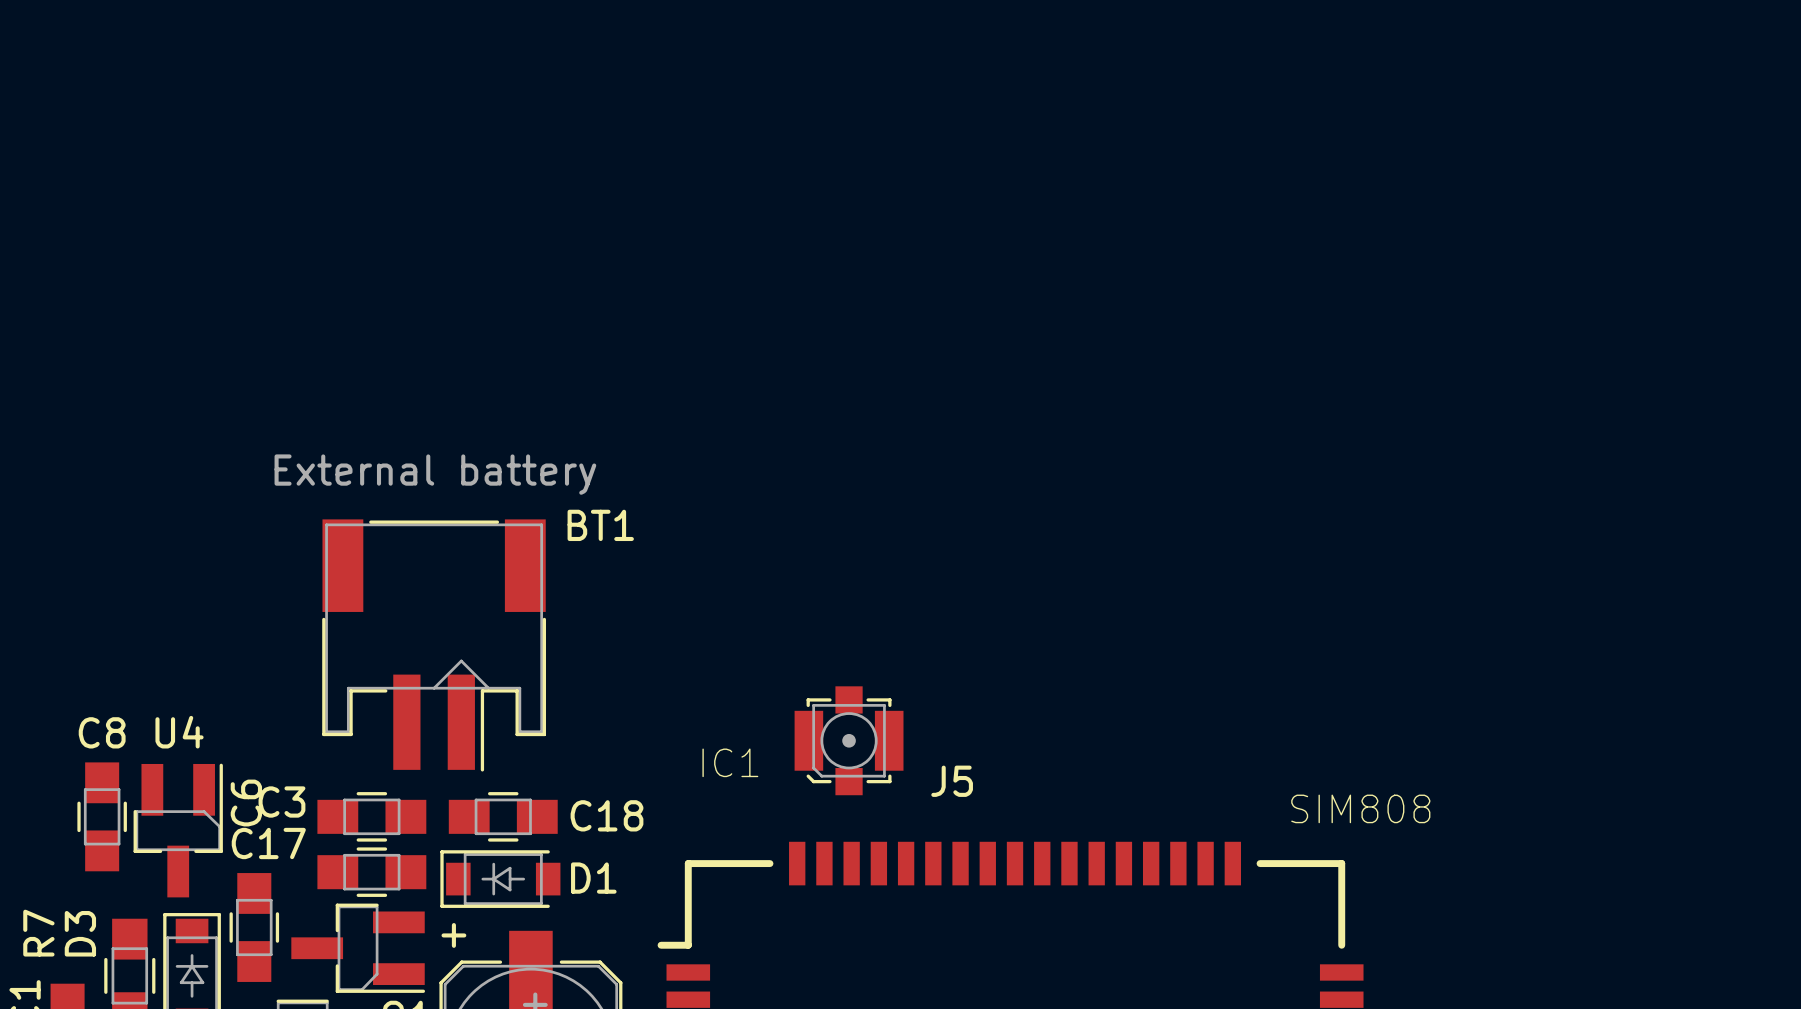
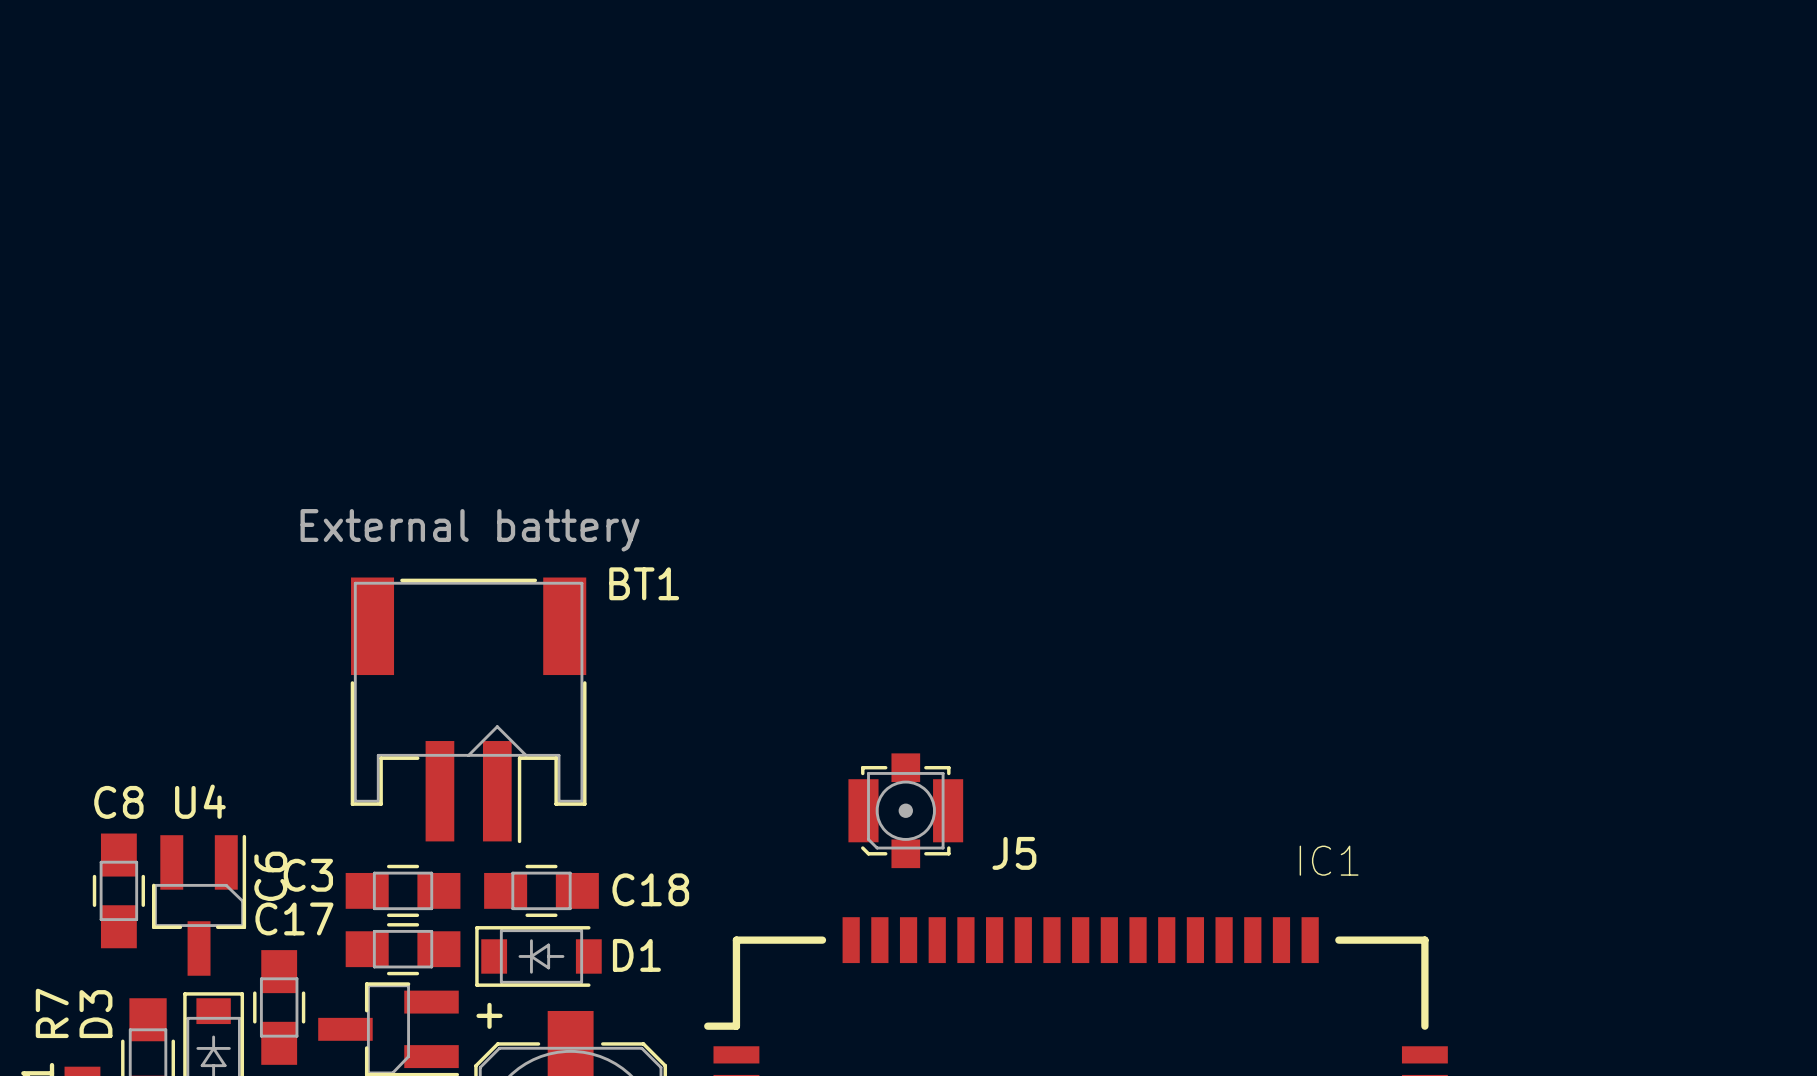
IC1 name position: IC1 (730, 762) -> IC1 (1329, 860)
IC1 value: SIM808 (1360, 808) -> none

